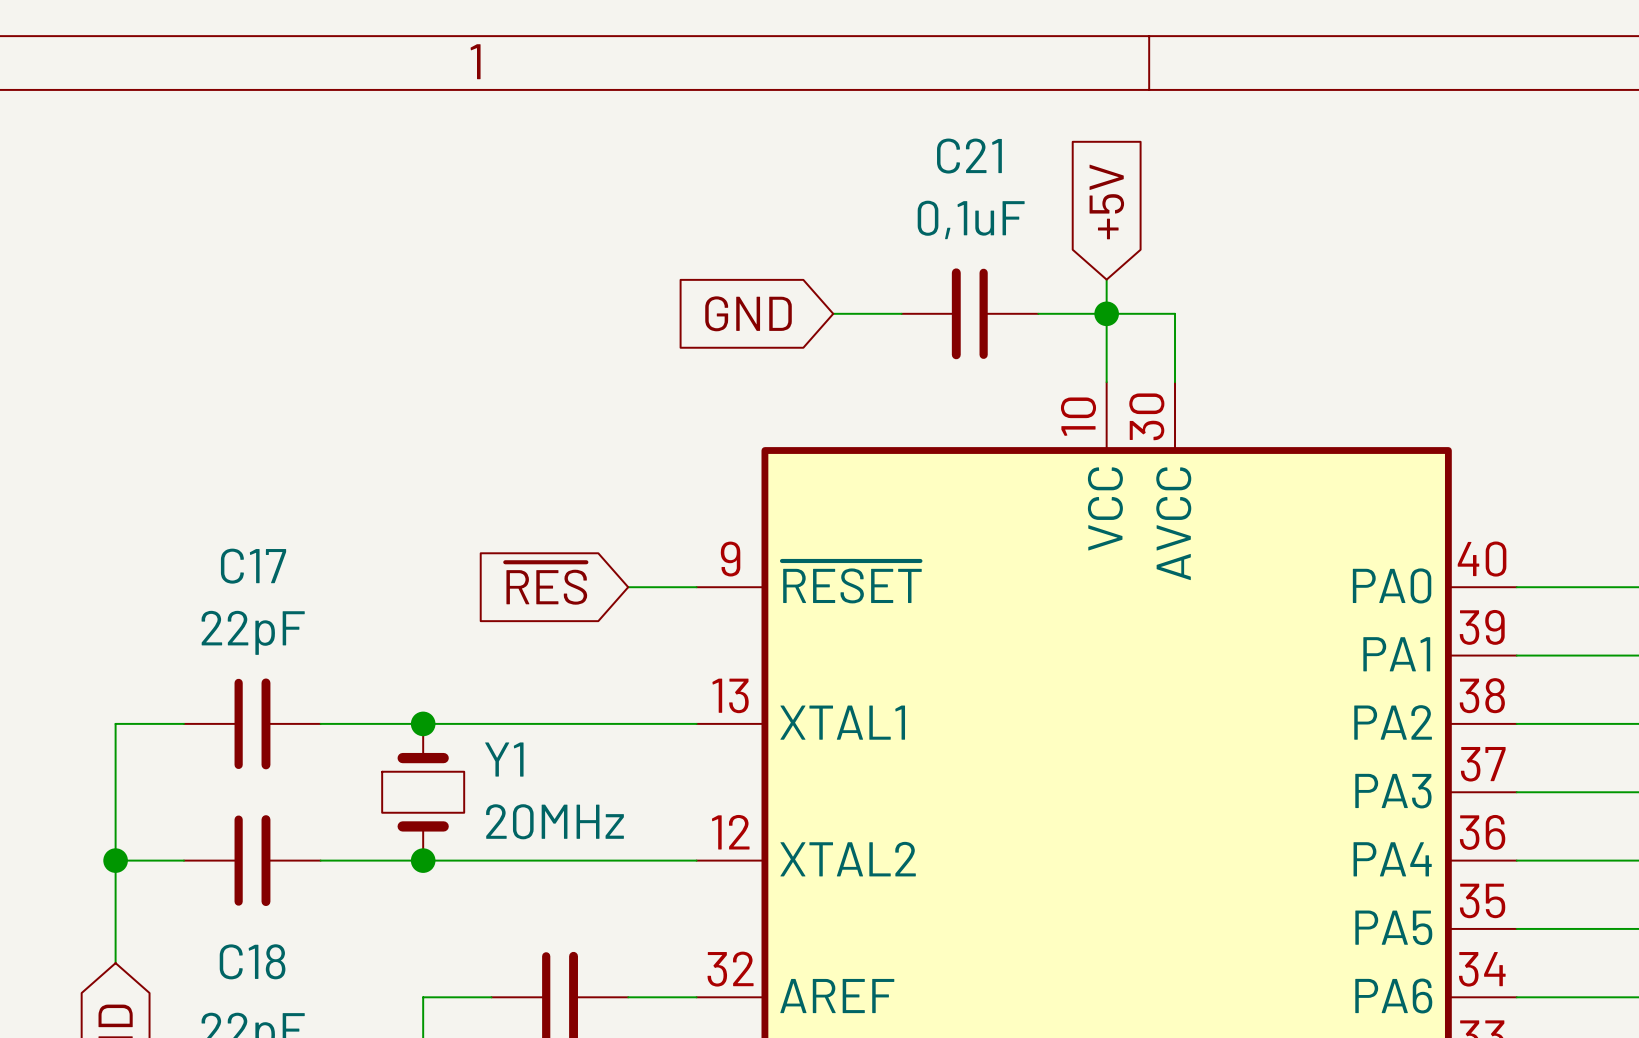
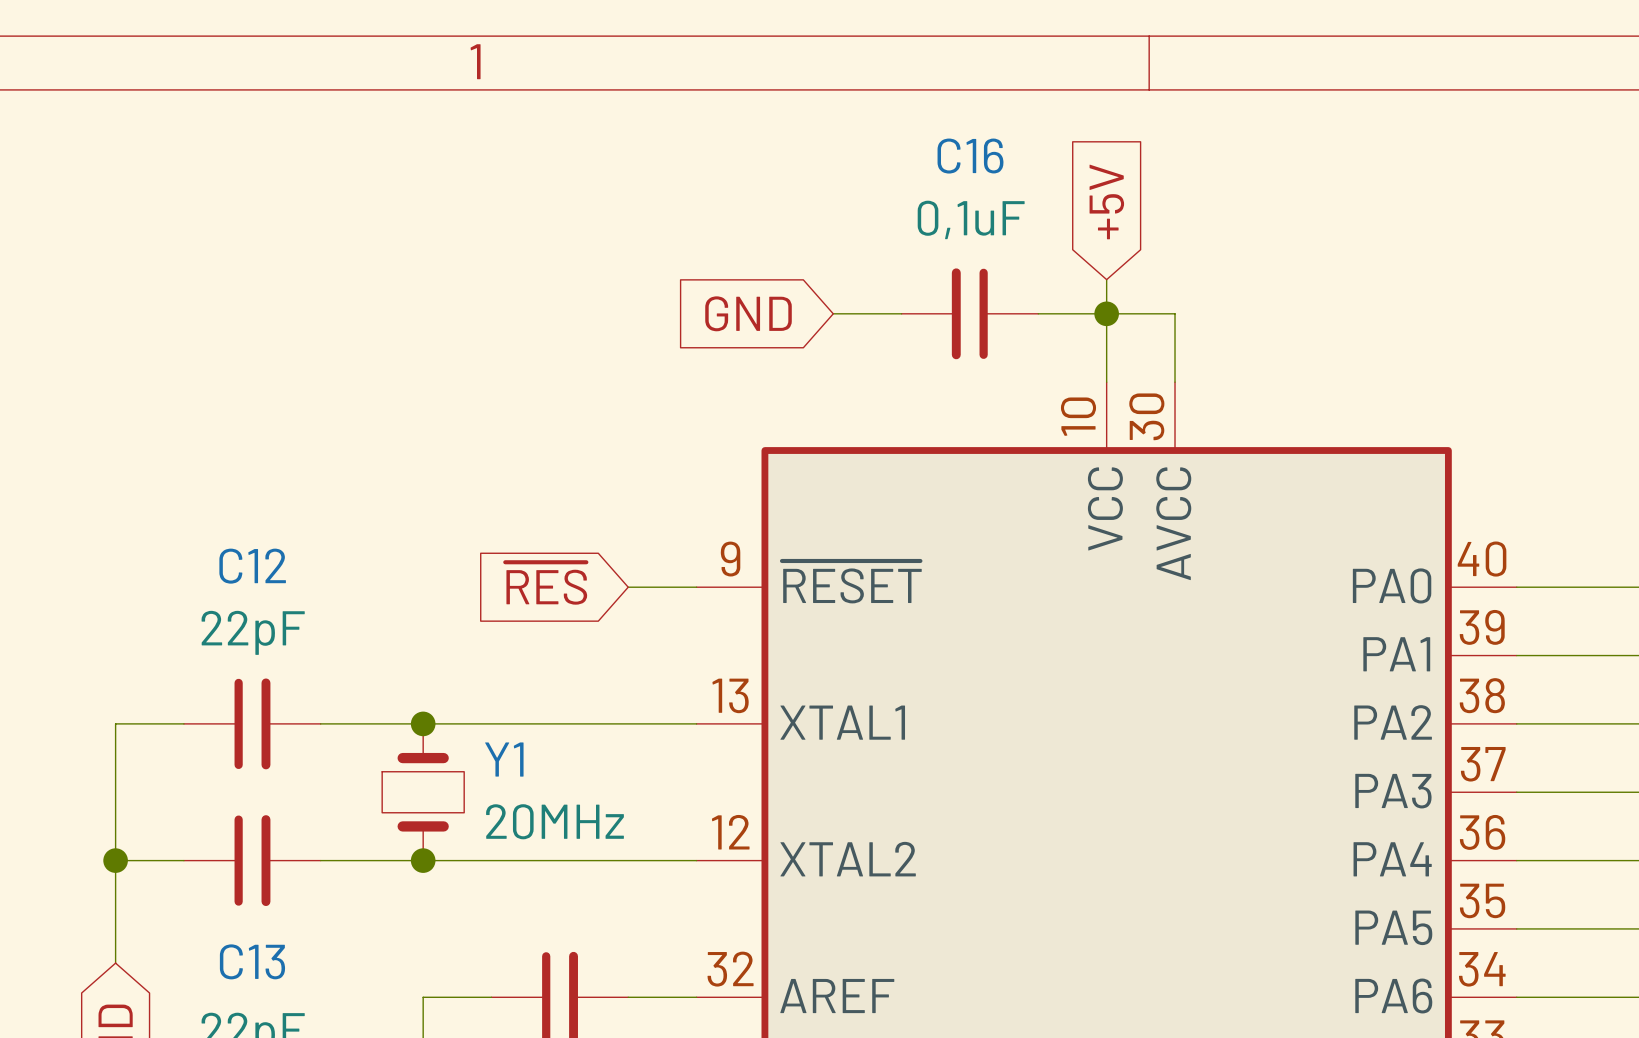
C21 name: C21 (969, 156) -> C16 (970, 156)
C17 name: C17 (253, 566) -> C12 (252, 566)
C18 name: C18 (252, 961) -> C13 (252, 961)

